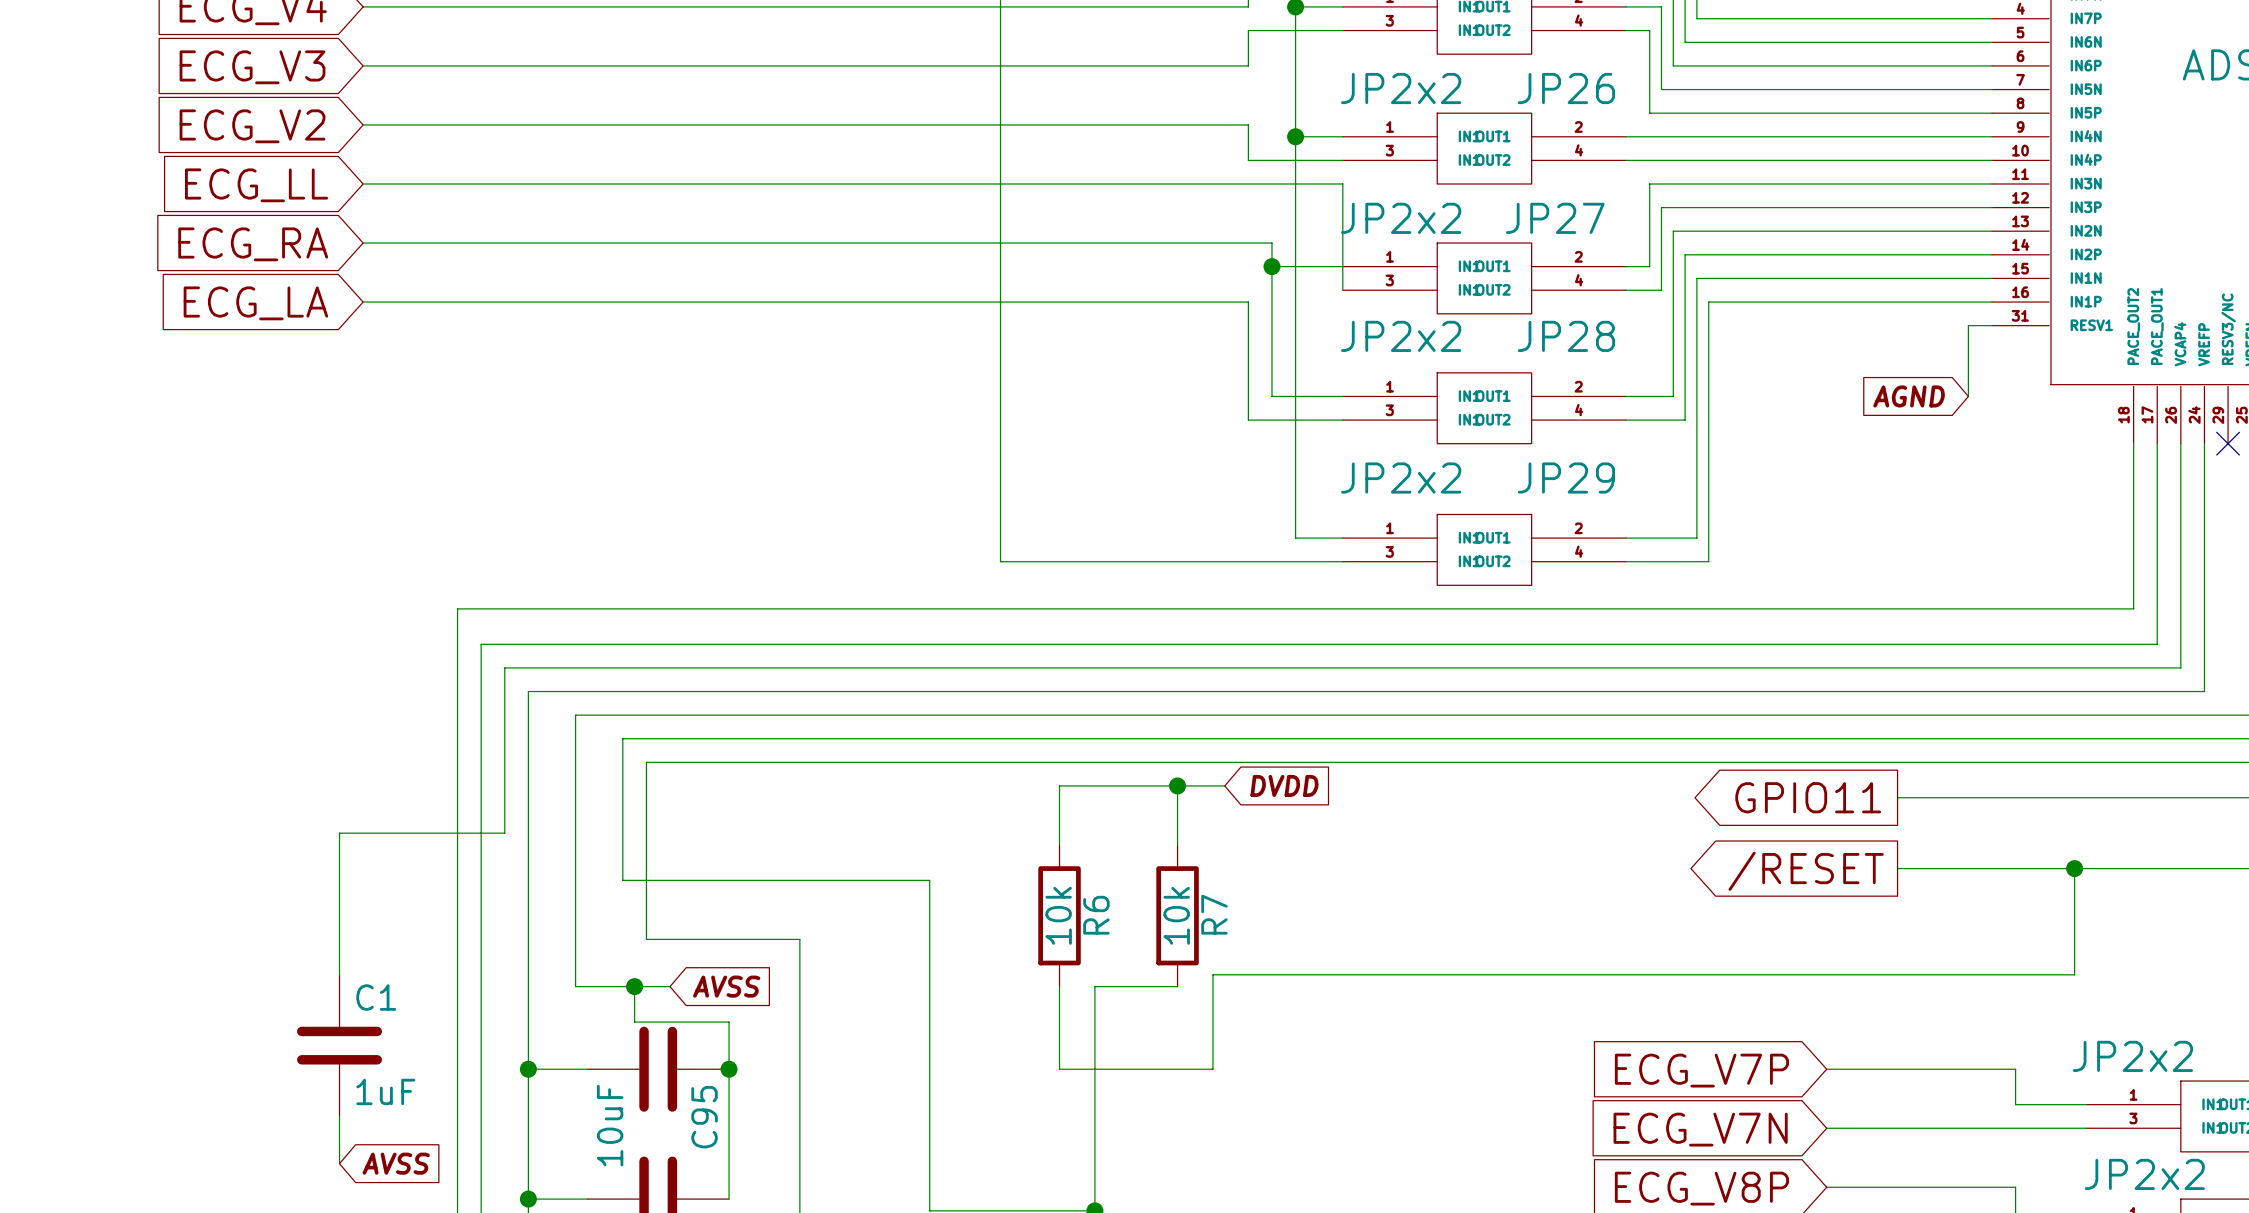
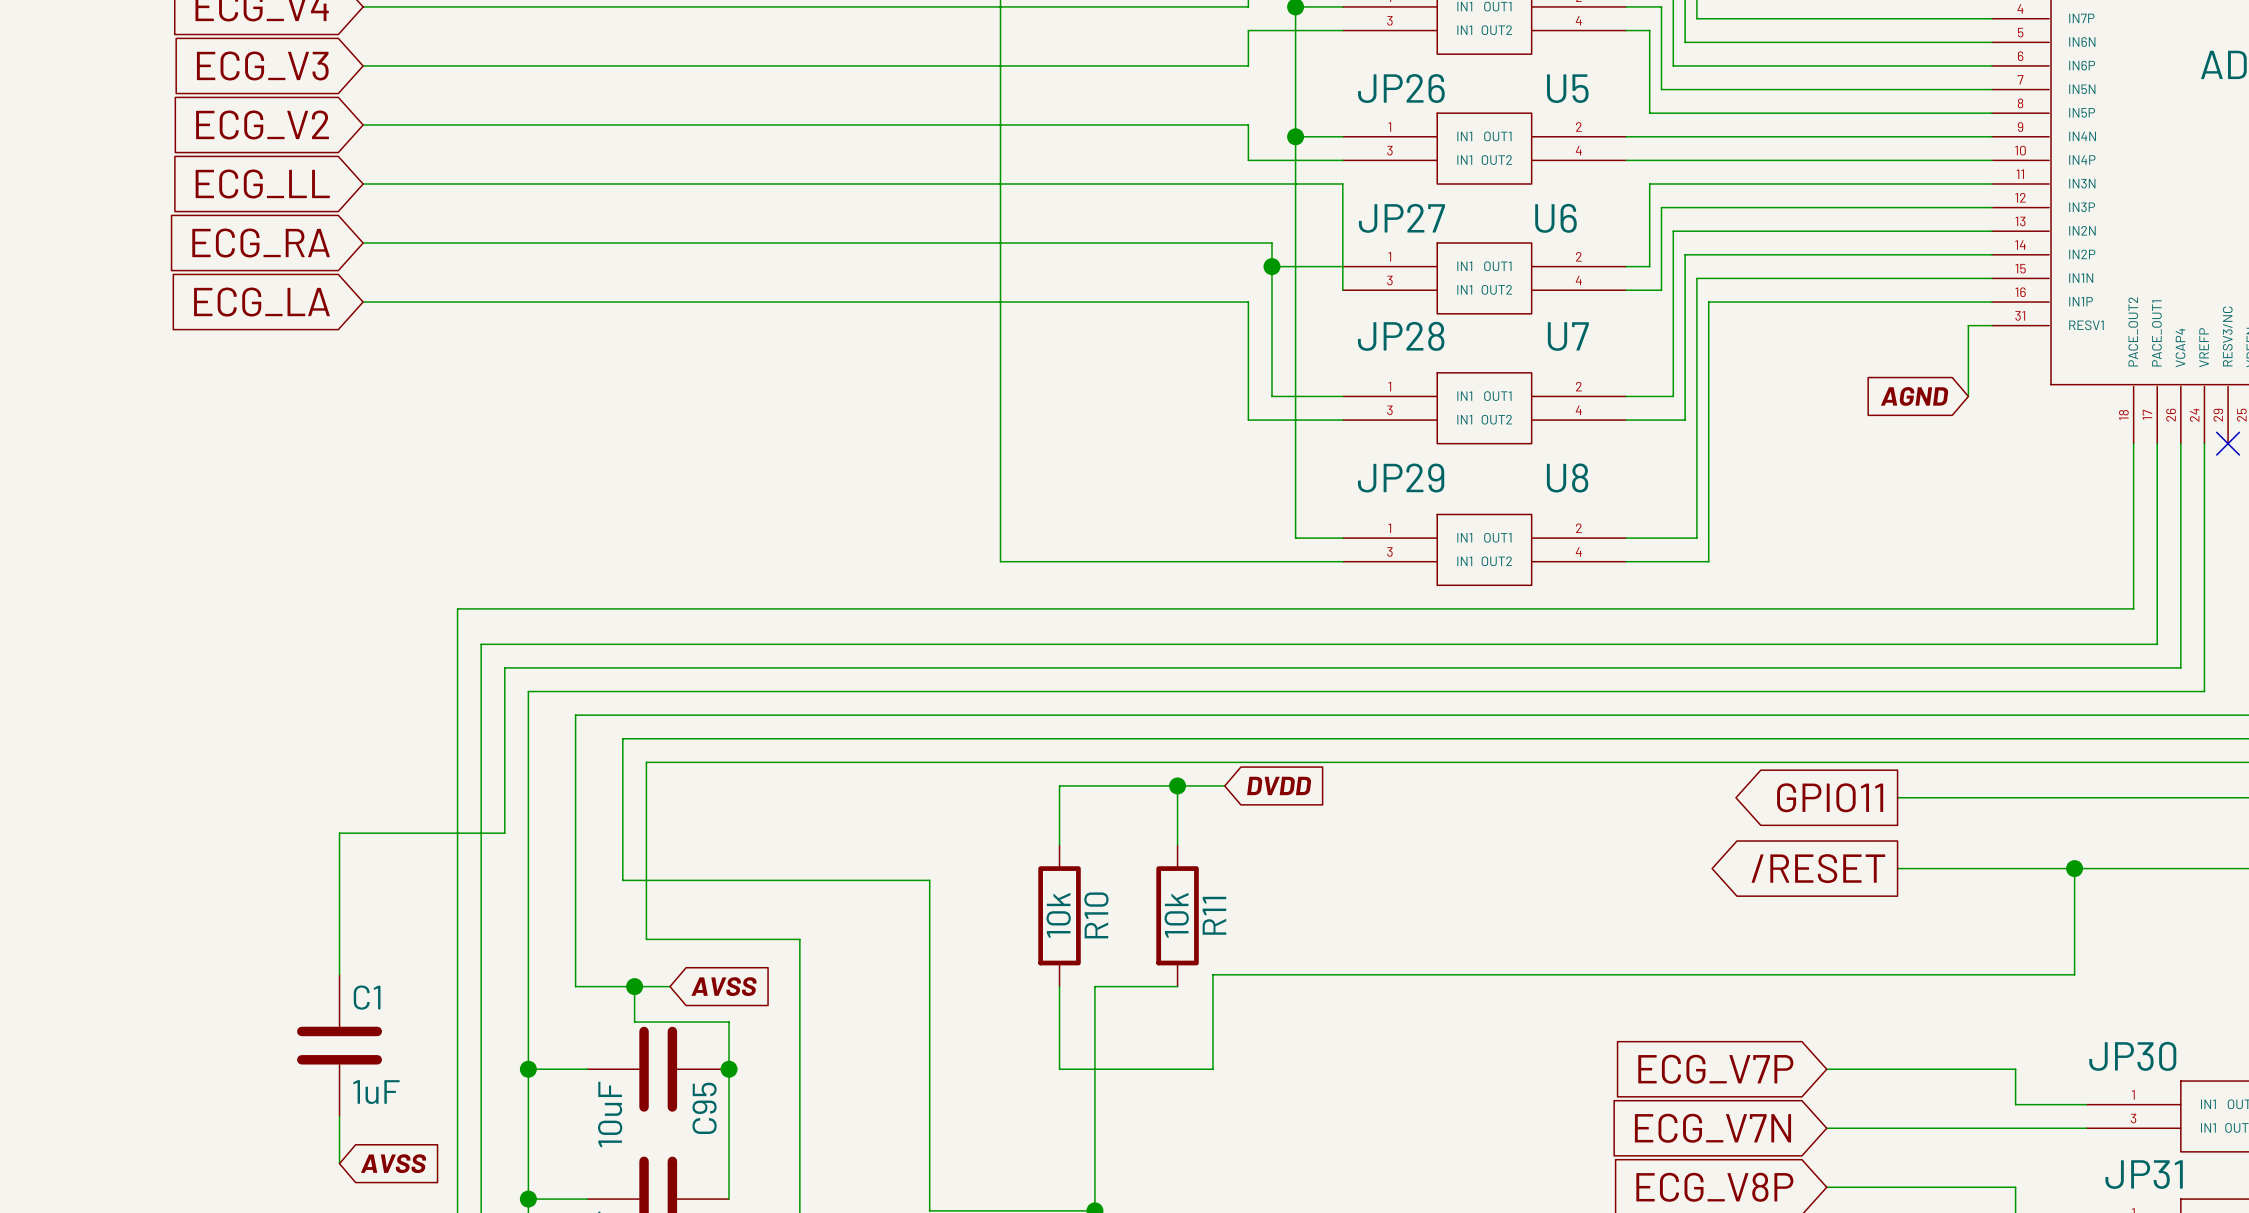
JP26 value: JP2x2 (1401, 88) -> JP26 (1401, 88)
JP26 name: JP26 (1566, 88) -> U5 (1567, 88)
JP27 value: JP2x2 (1401, 218) -> JP27 (1401, 218)
JP27 name: JP27 (1555, 218) -> U6 (1555, 218)
JP28 value: JP2x2 (1401, 336) -> JP28 (1401, 336)
JP28 name: JP28 (1566, 336) -> U7 (1568, 336)
JP29 value: JP2x2 (1401, 478) -> JP29 (1401, 478)
JP29 name: JP29 (1566, 478) -> U8 (1567, 477)
R7 name: R7 (1214, 914) -> R11 (1214, 915)
R6 name: R6 (1096, 915) -> R10 (1096, 915)
part value: JP2x2 (2132, 1056) -> JP30 (2132, 1056)
part value: JP2x2 (2144, 1174) -> JP31 (2144, 1174)

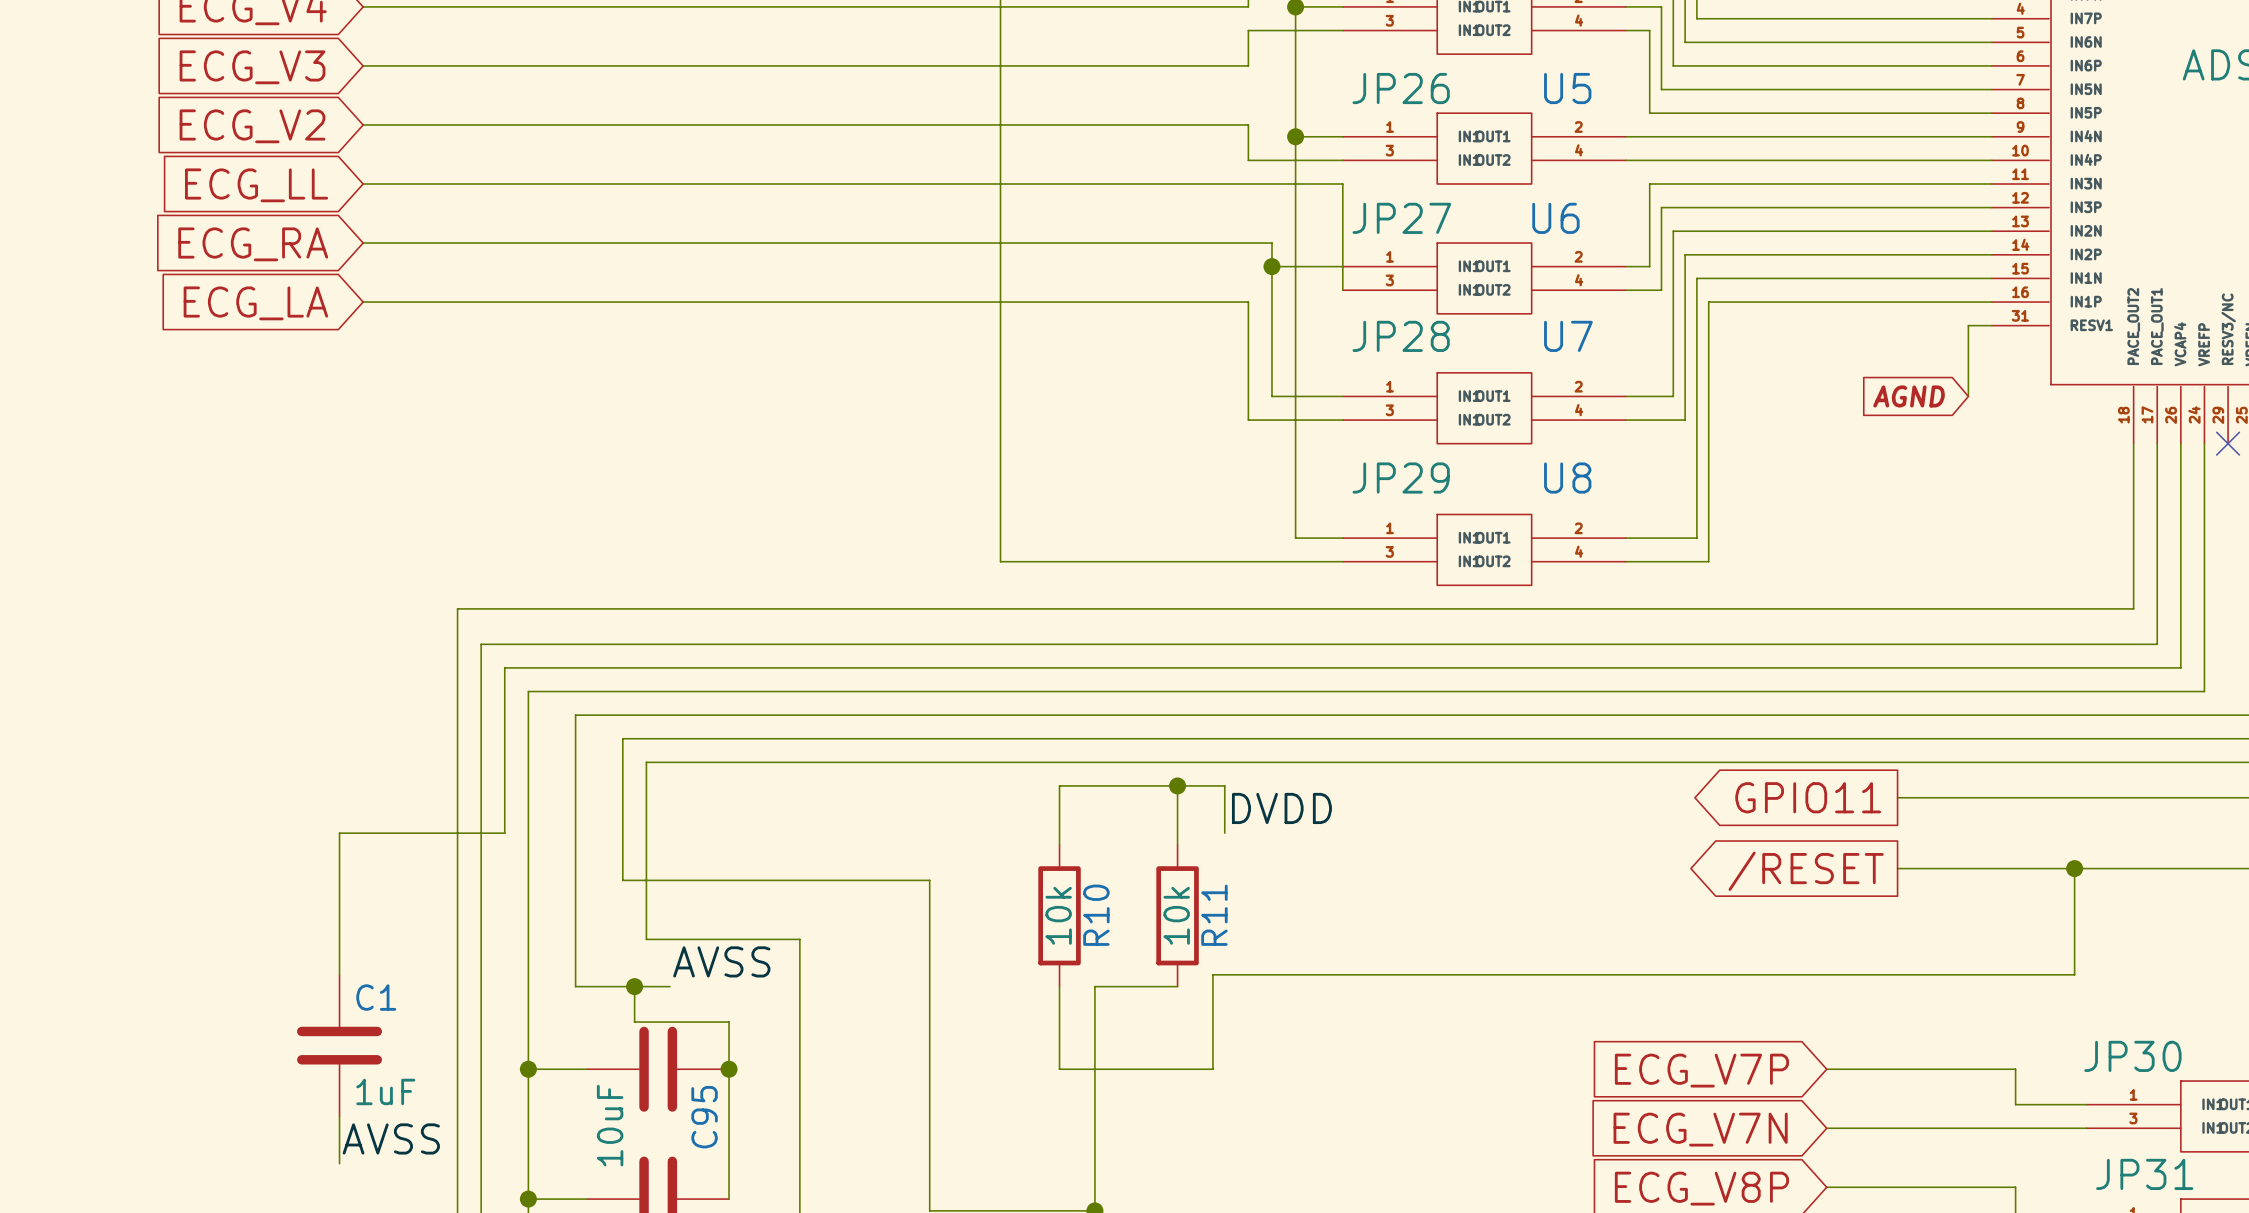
wire: none -> (1224, 785) (1224, 833)
global label: DVDD (1279, 785) -> none
label: none -> DVDD (1281, 808)
label: none -> AVSS (721, 961)
global label: AVSS (724, 986) -> none
label: none -> AVSS (391, 1138)
global label: AVSS (393, 1163) -> none

